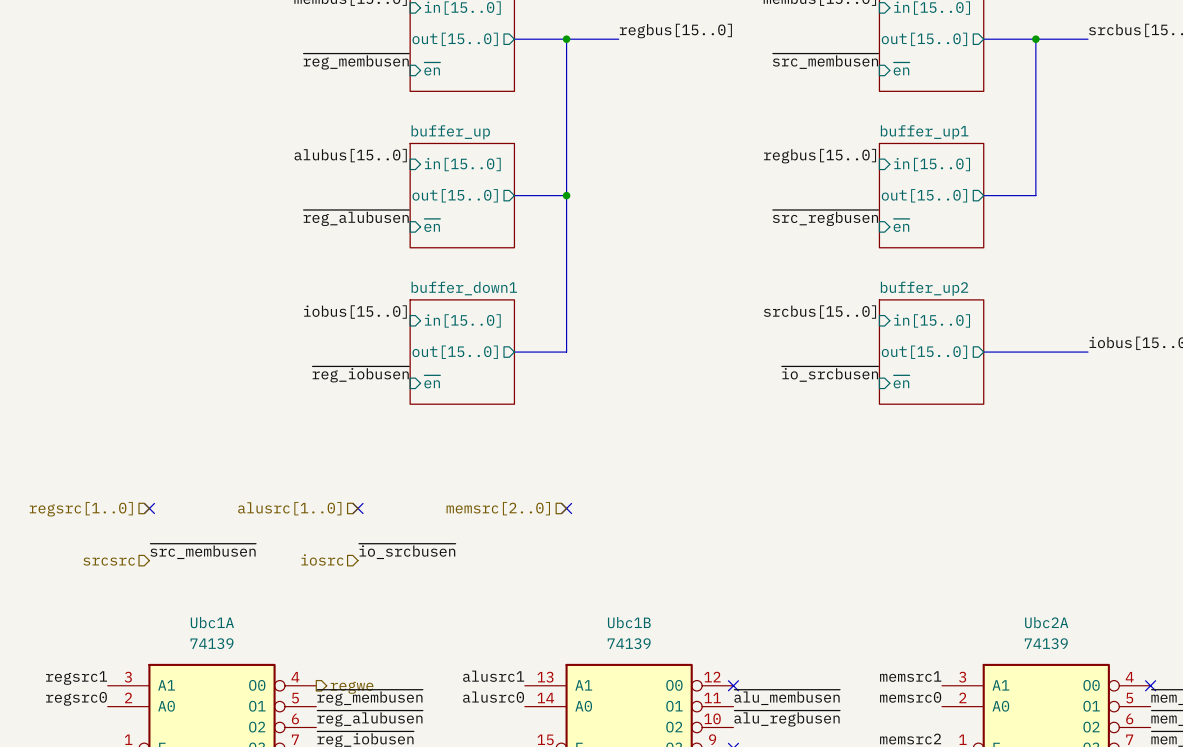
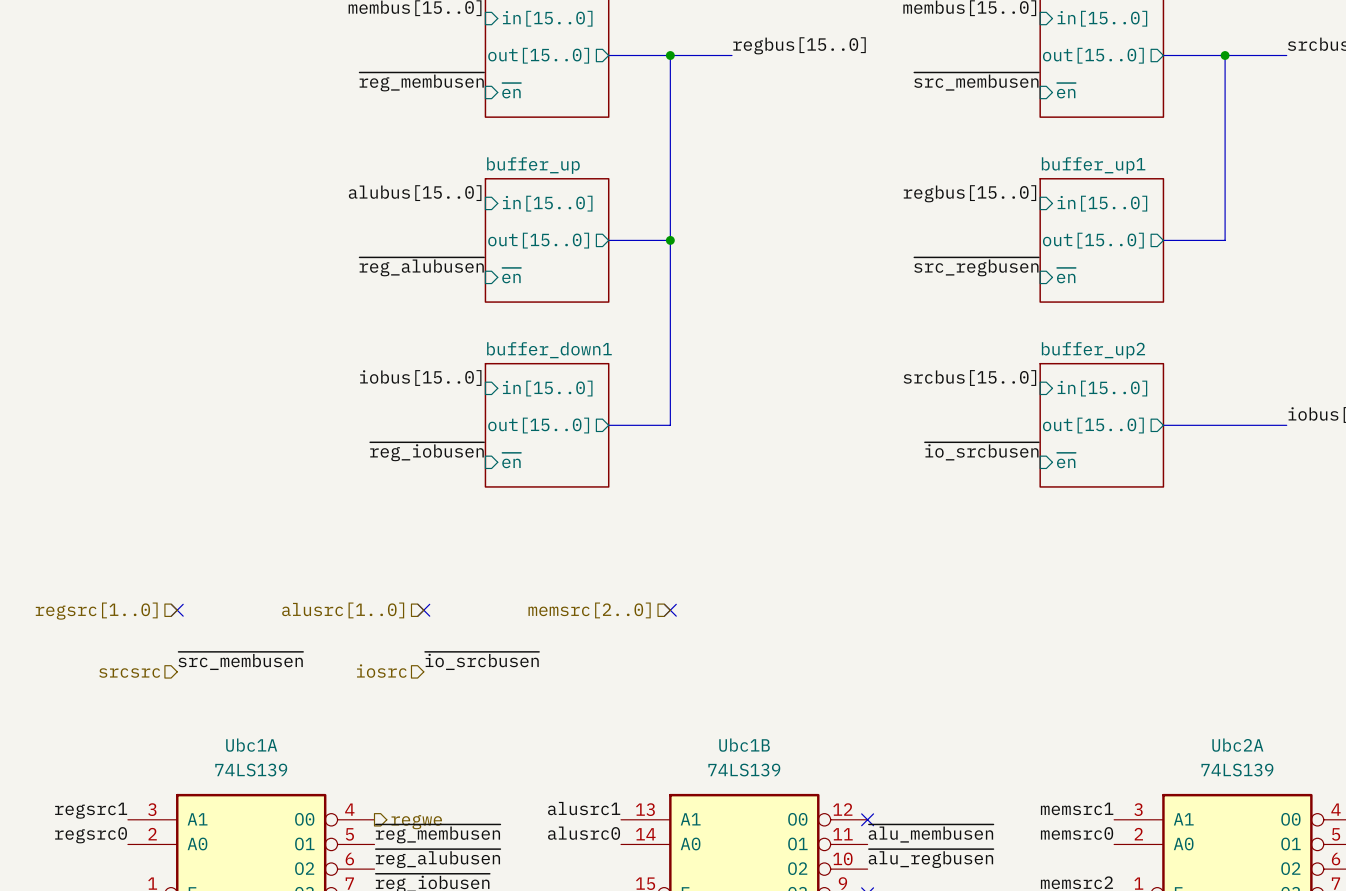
Ubc1A value: 74139 (212, 643) -> 74LS139 (251, 770)
Ubc1B value: 74139 (629, 643) -> 74LS139 (744, 770)
Ubc2A value: 74139 (1046, 643) -> 74LS139 (1237, 770)

